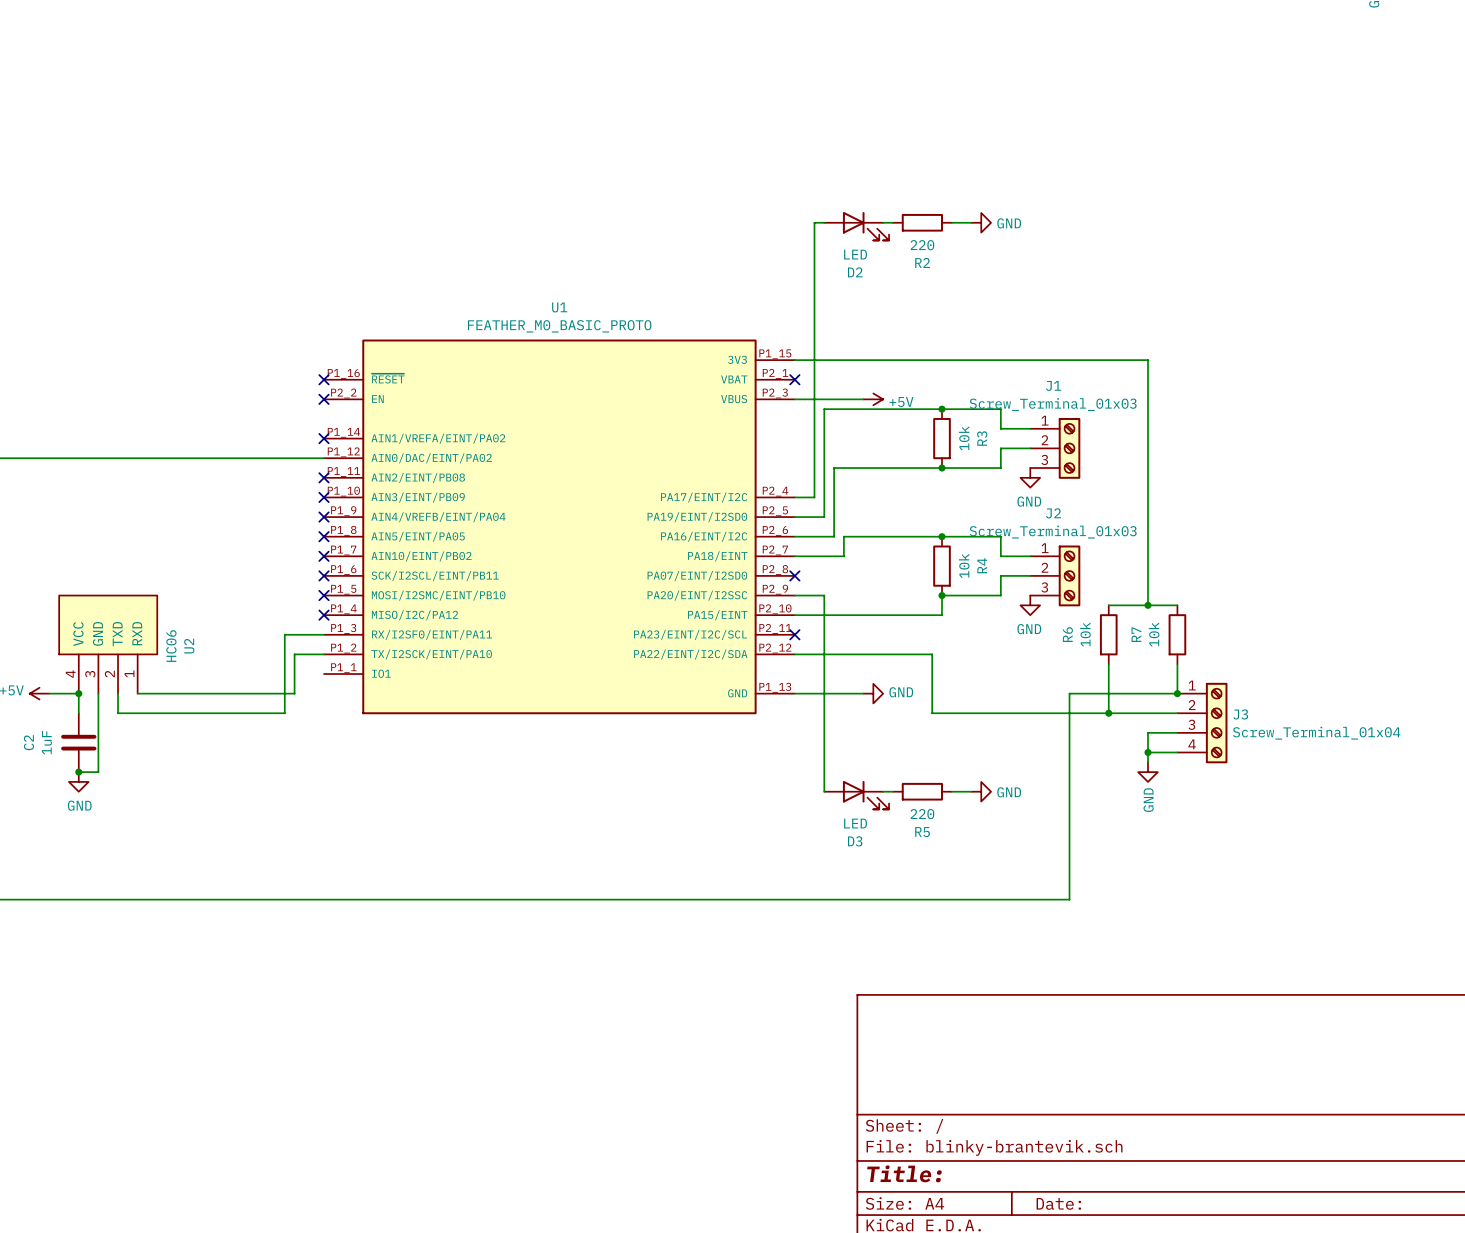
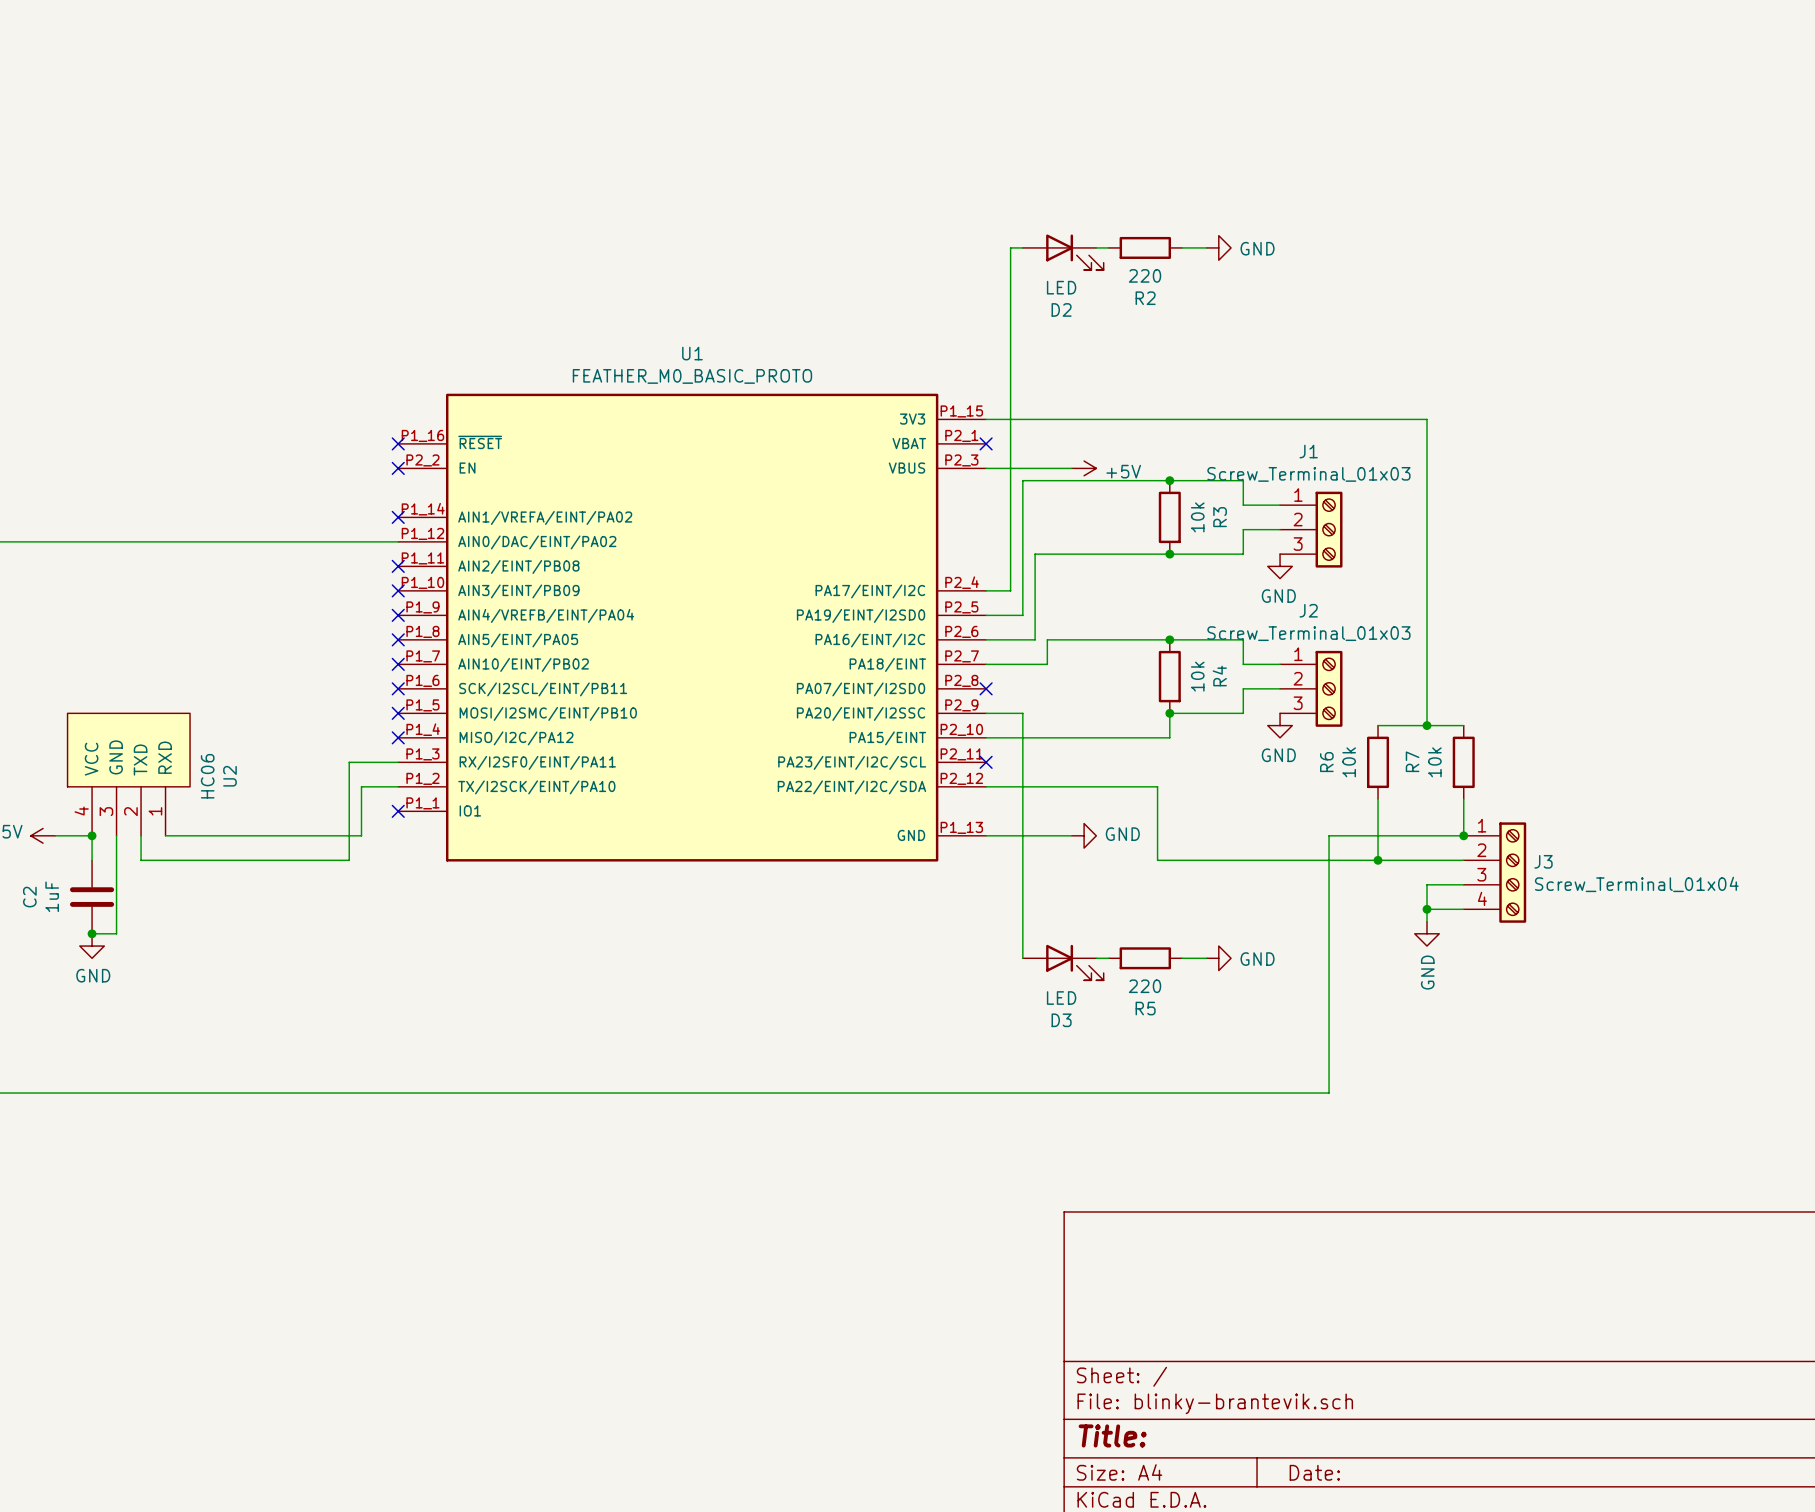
no-connect mark: none -> (398, 811)

